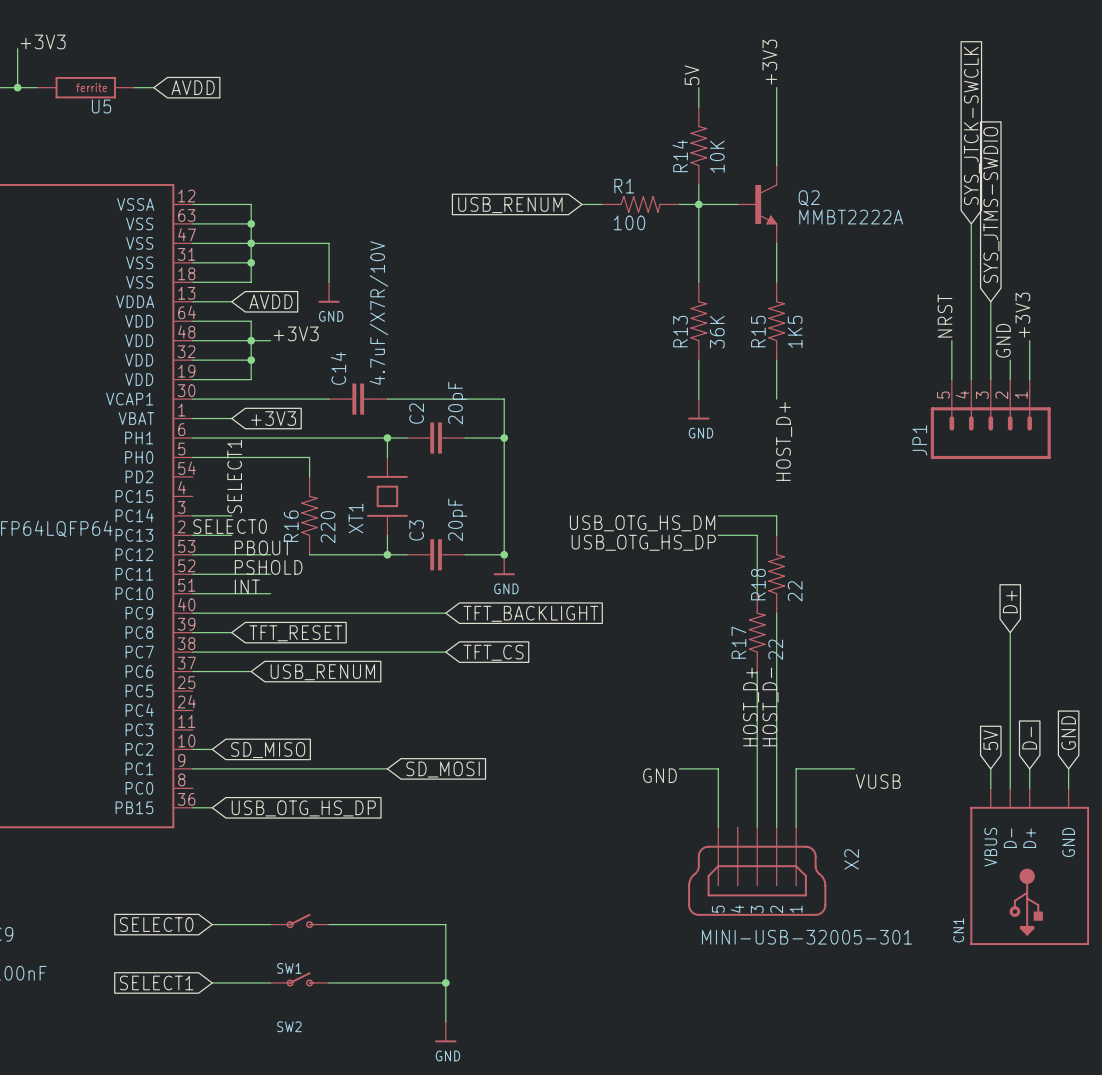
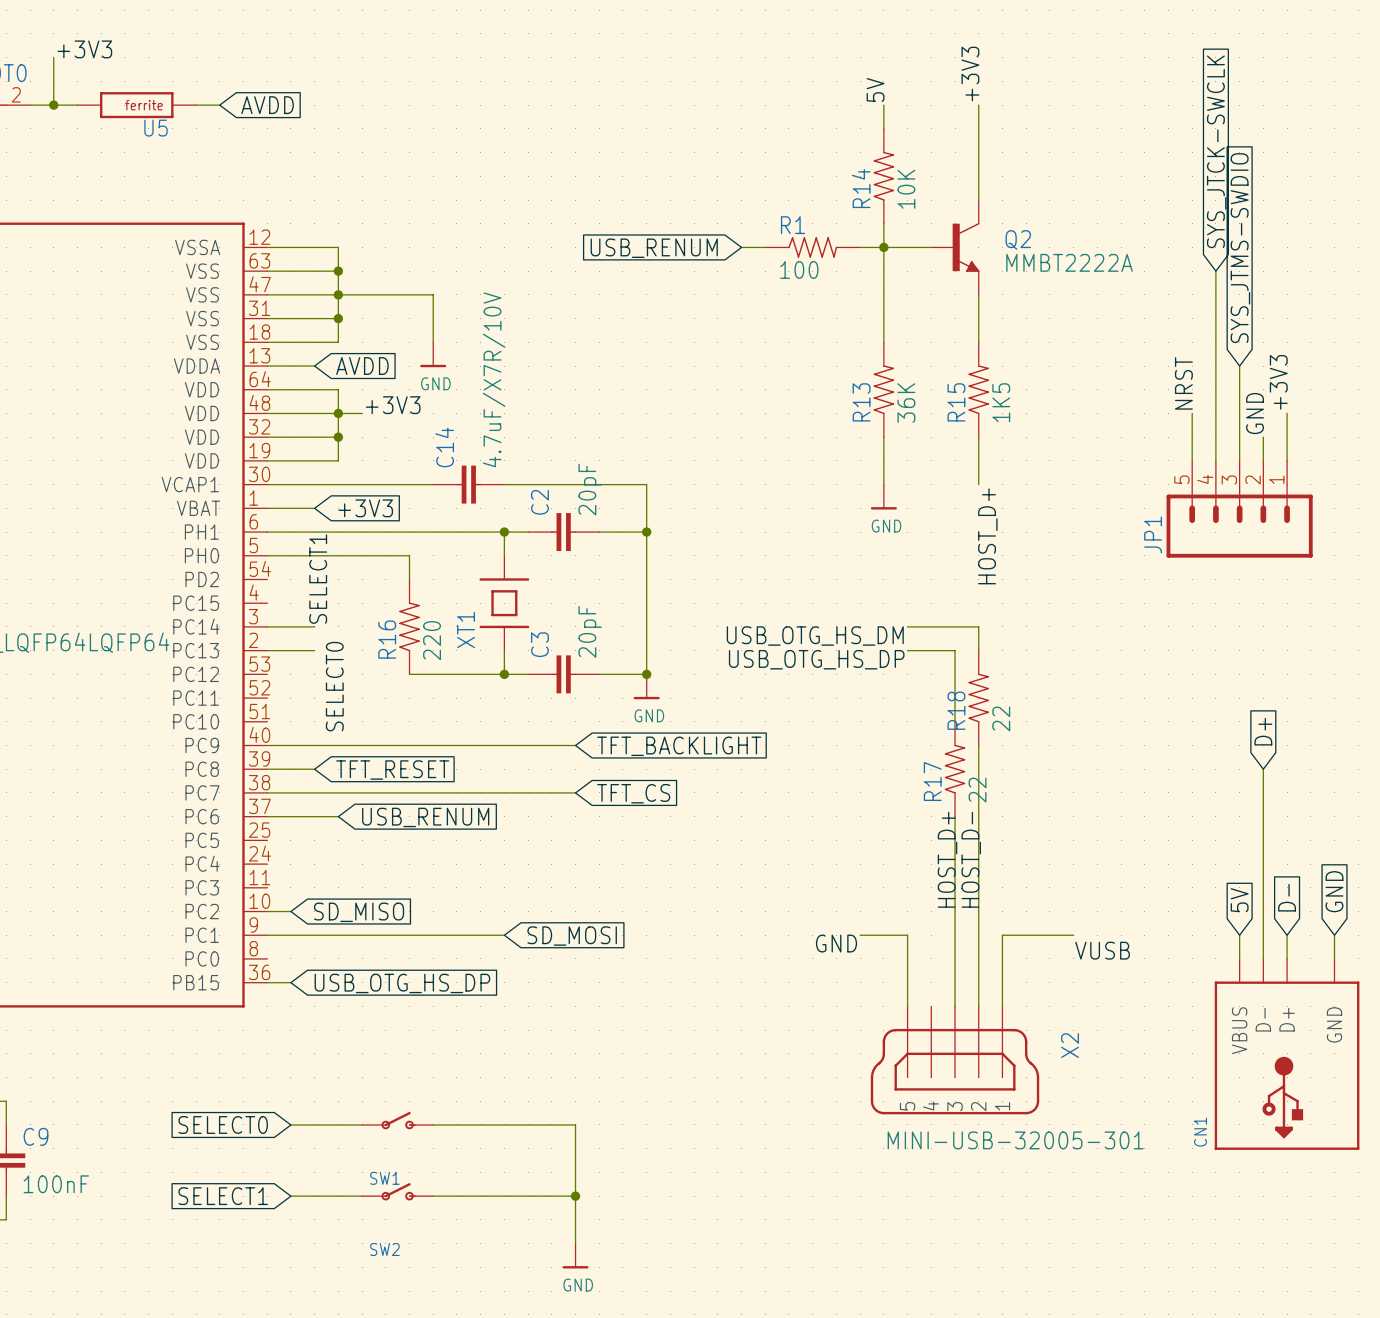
label rotation: 0° (230, 526) -> 90° counterclockwise (334, 686)
label: PBOUT (263, 547) -> none
wire: (192, 554) (270, 554) -> none
label: PSHOLD (268, 567) -> none
wire: (192, 574) (270, 574) -> none
label: INT (247, 586) -> none
wire: (192, 593) (270, 593) -> none

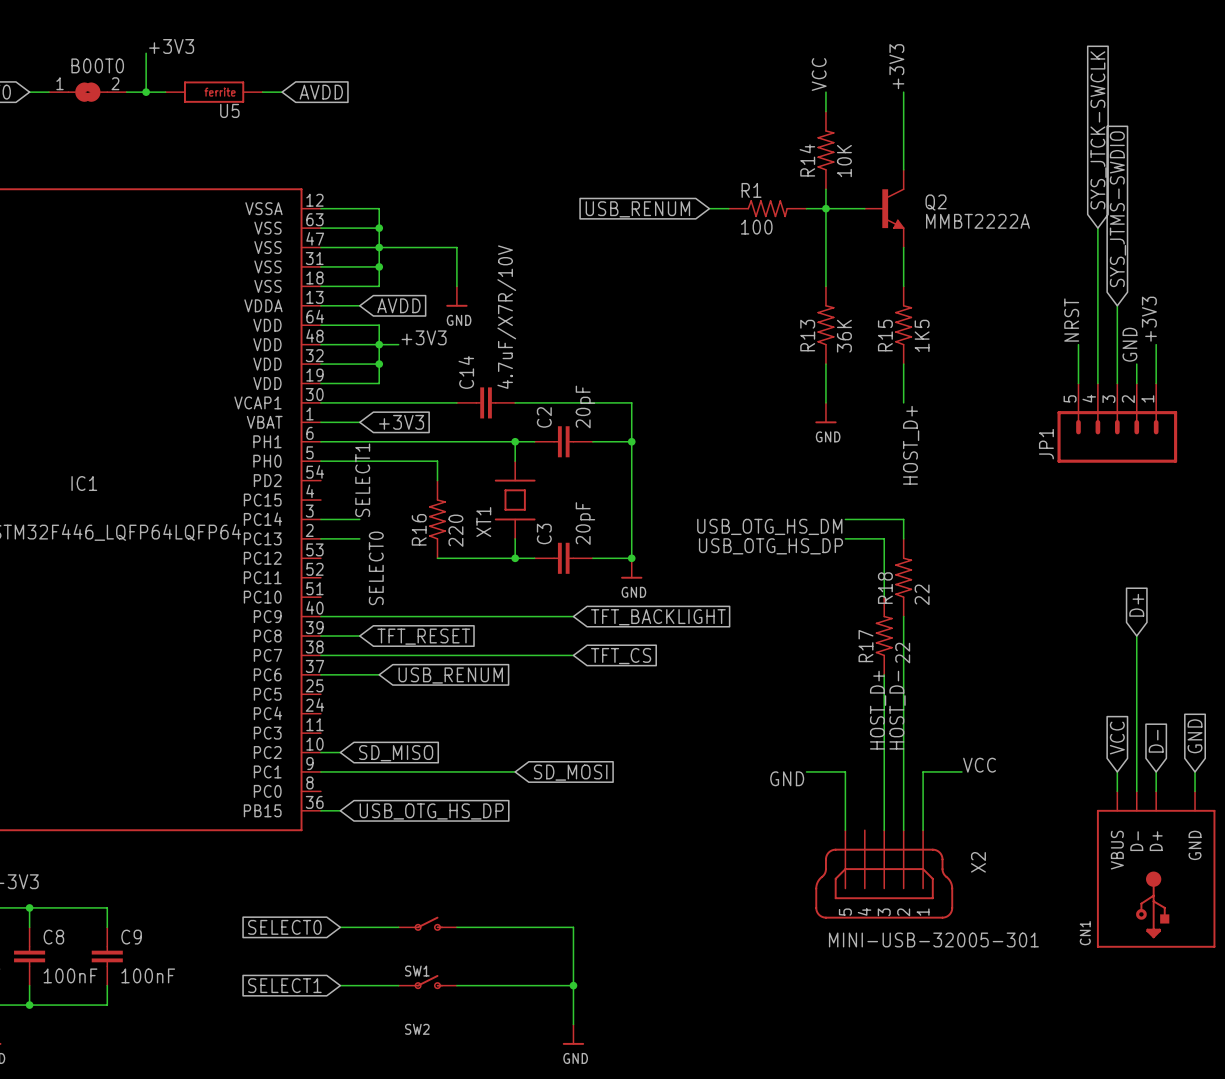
label: 5V (875, 90) -> VCC (819, 74)
global label: 5V (1239, 900) -> VCC (1117, 738)
label: none -> VCC (979, 765)
wire: (1049, 935) (1073, 935) -> none
label: VUSB (1102, 950) -> none

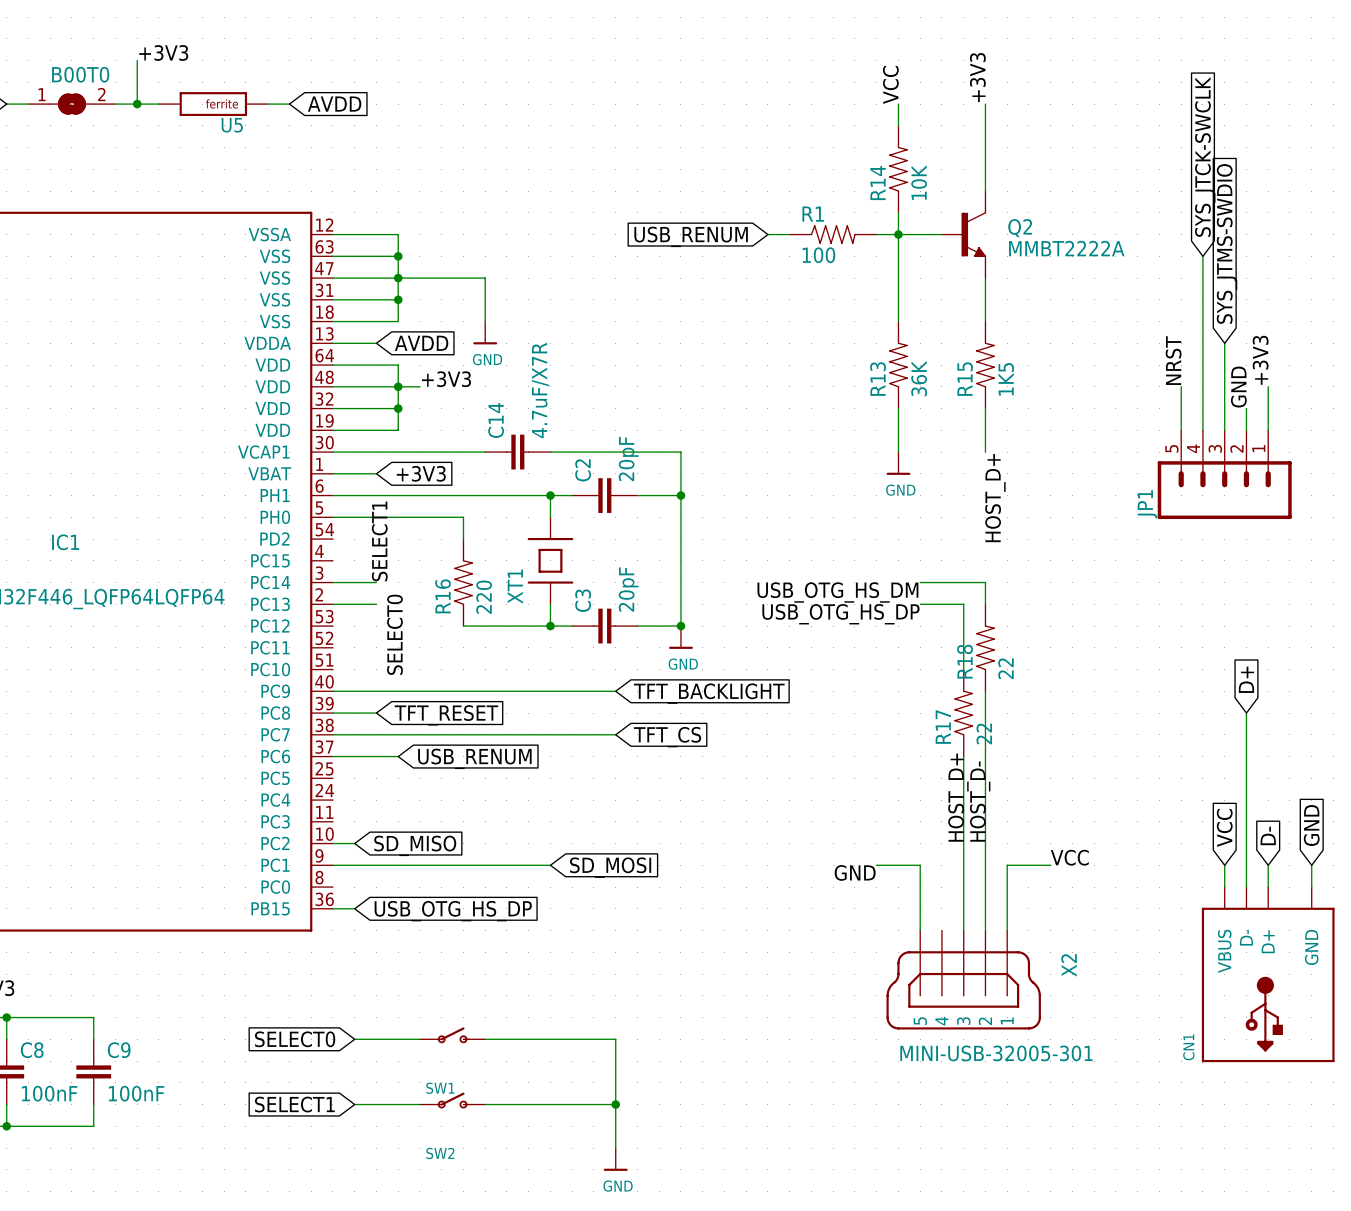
C14 value: 4.7uF/X7R/10V (506, 317) -> 4.7uF/X7R (540, 390)

